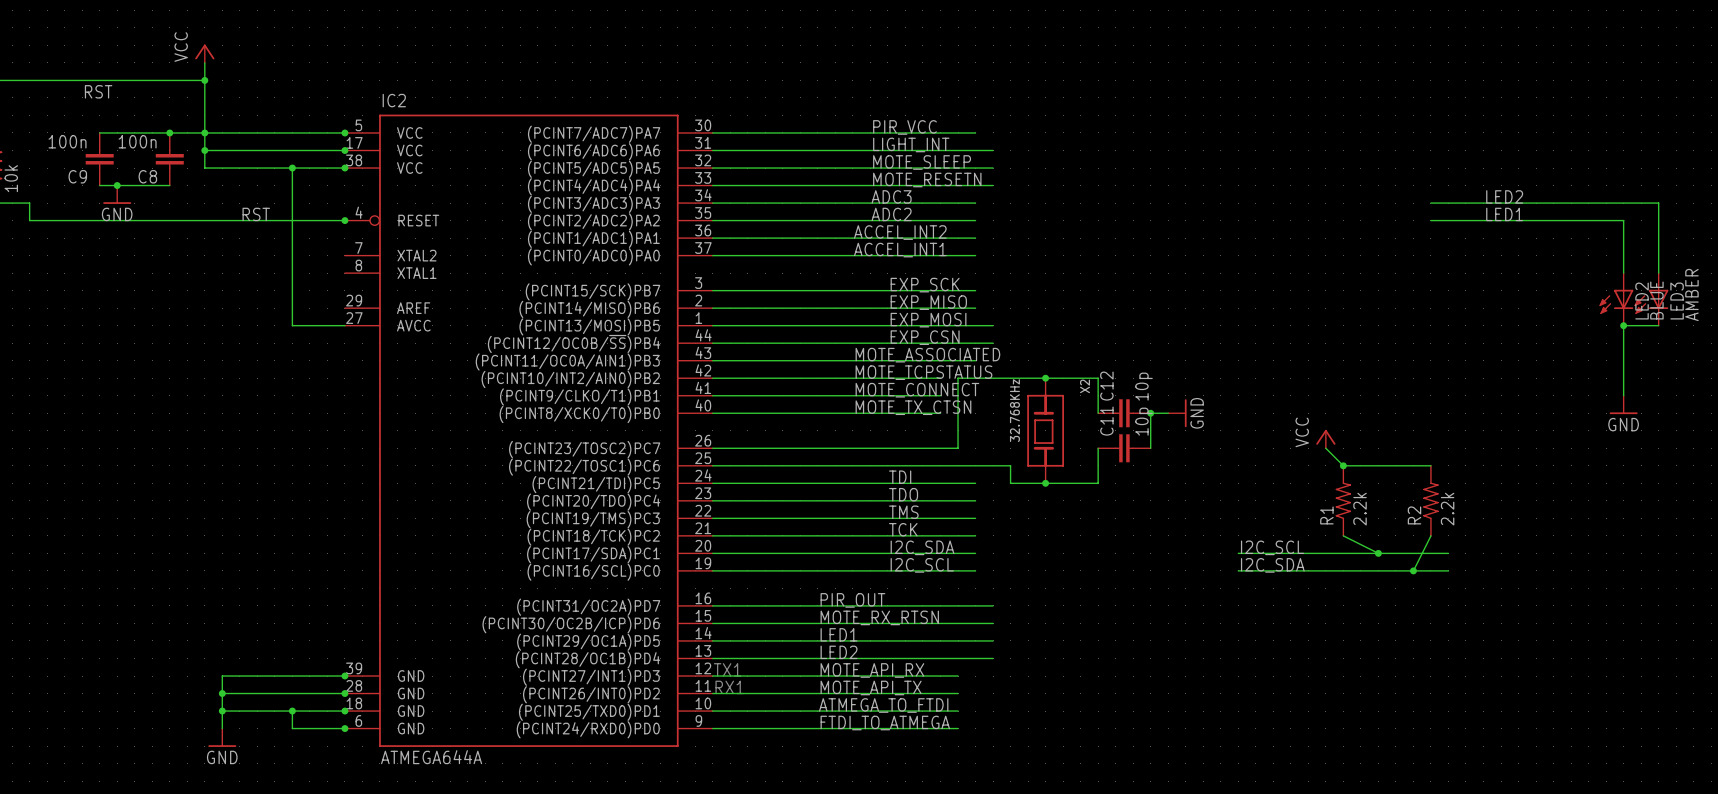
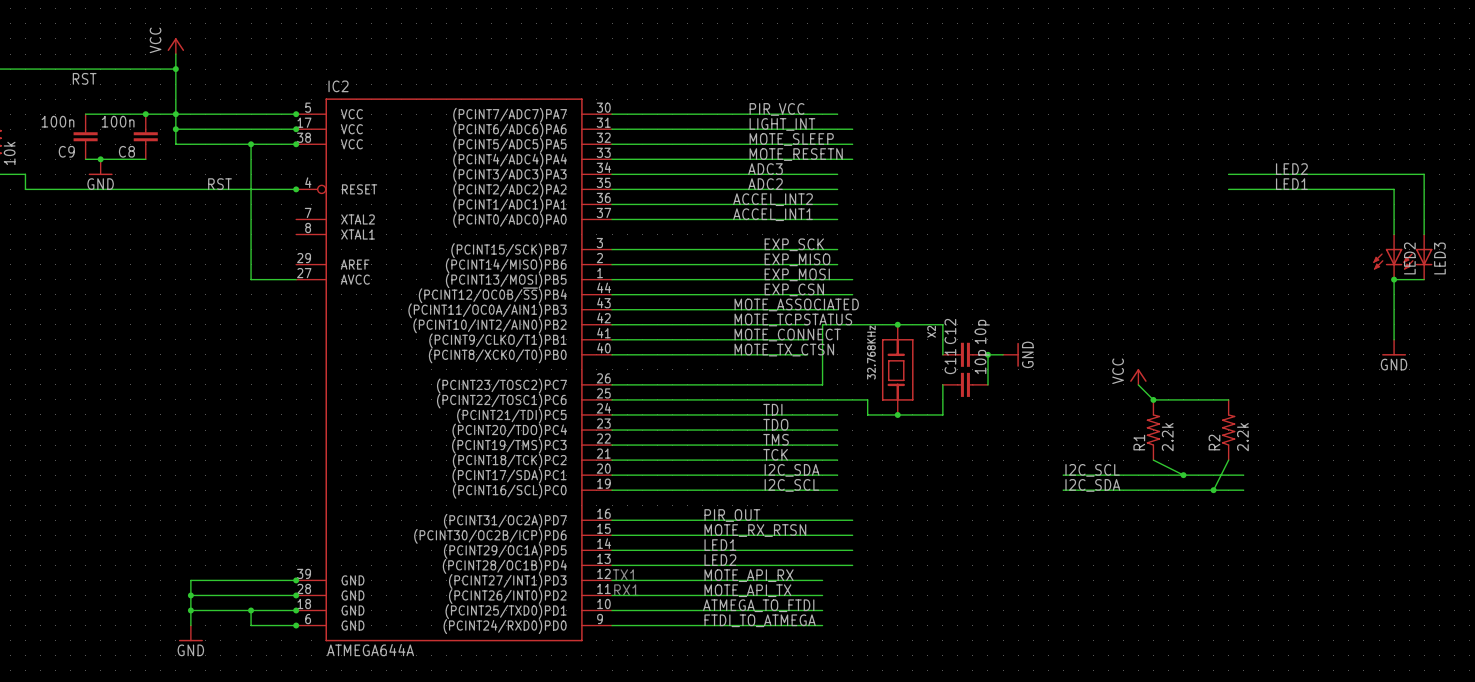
LED3 value: AMBER (1691, 294) -> none
LED2 value: BLUE (1656, 300) -> none

